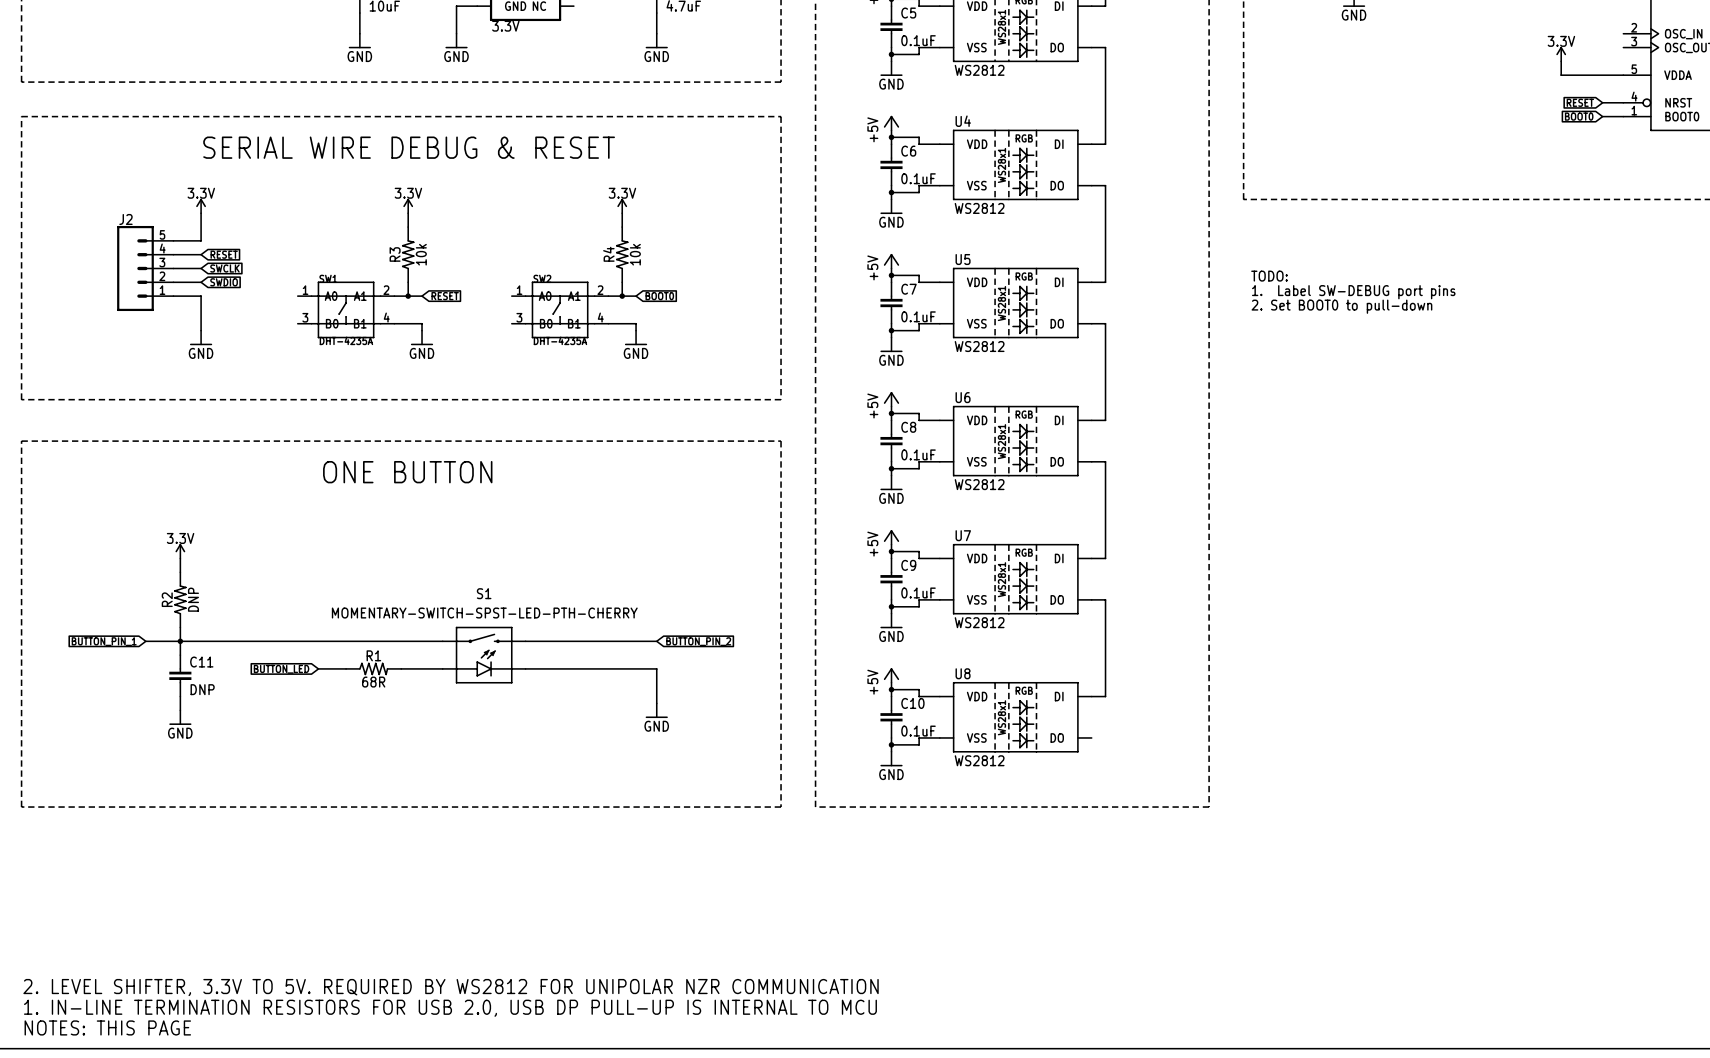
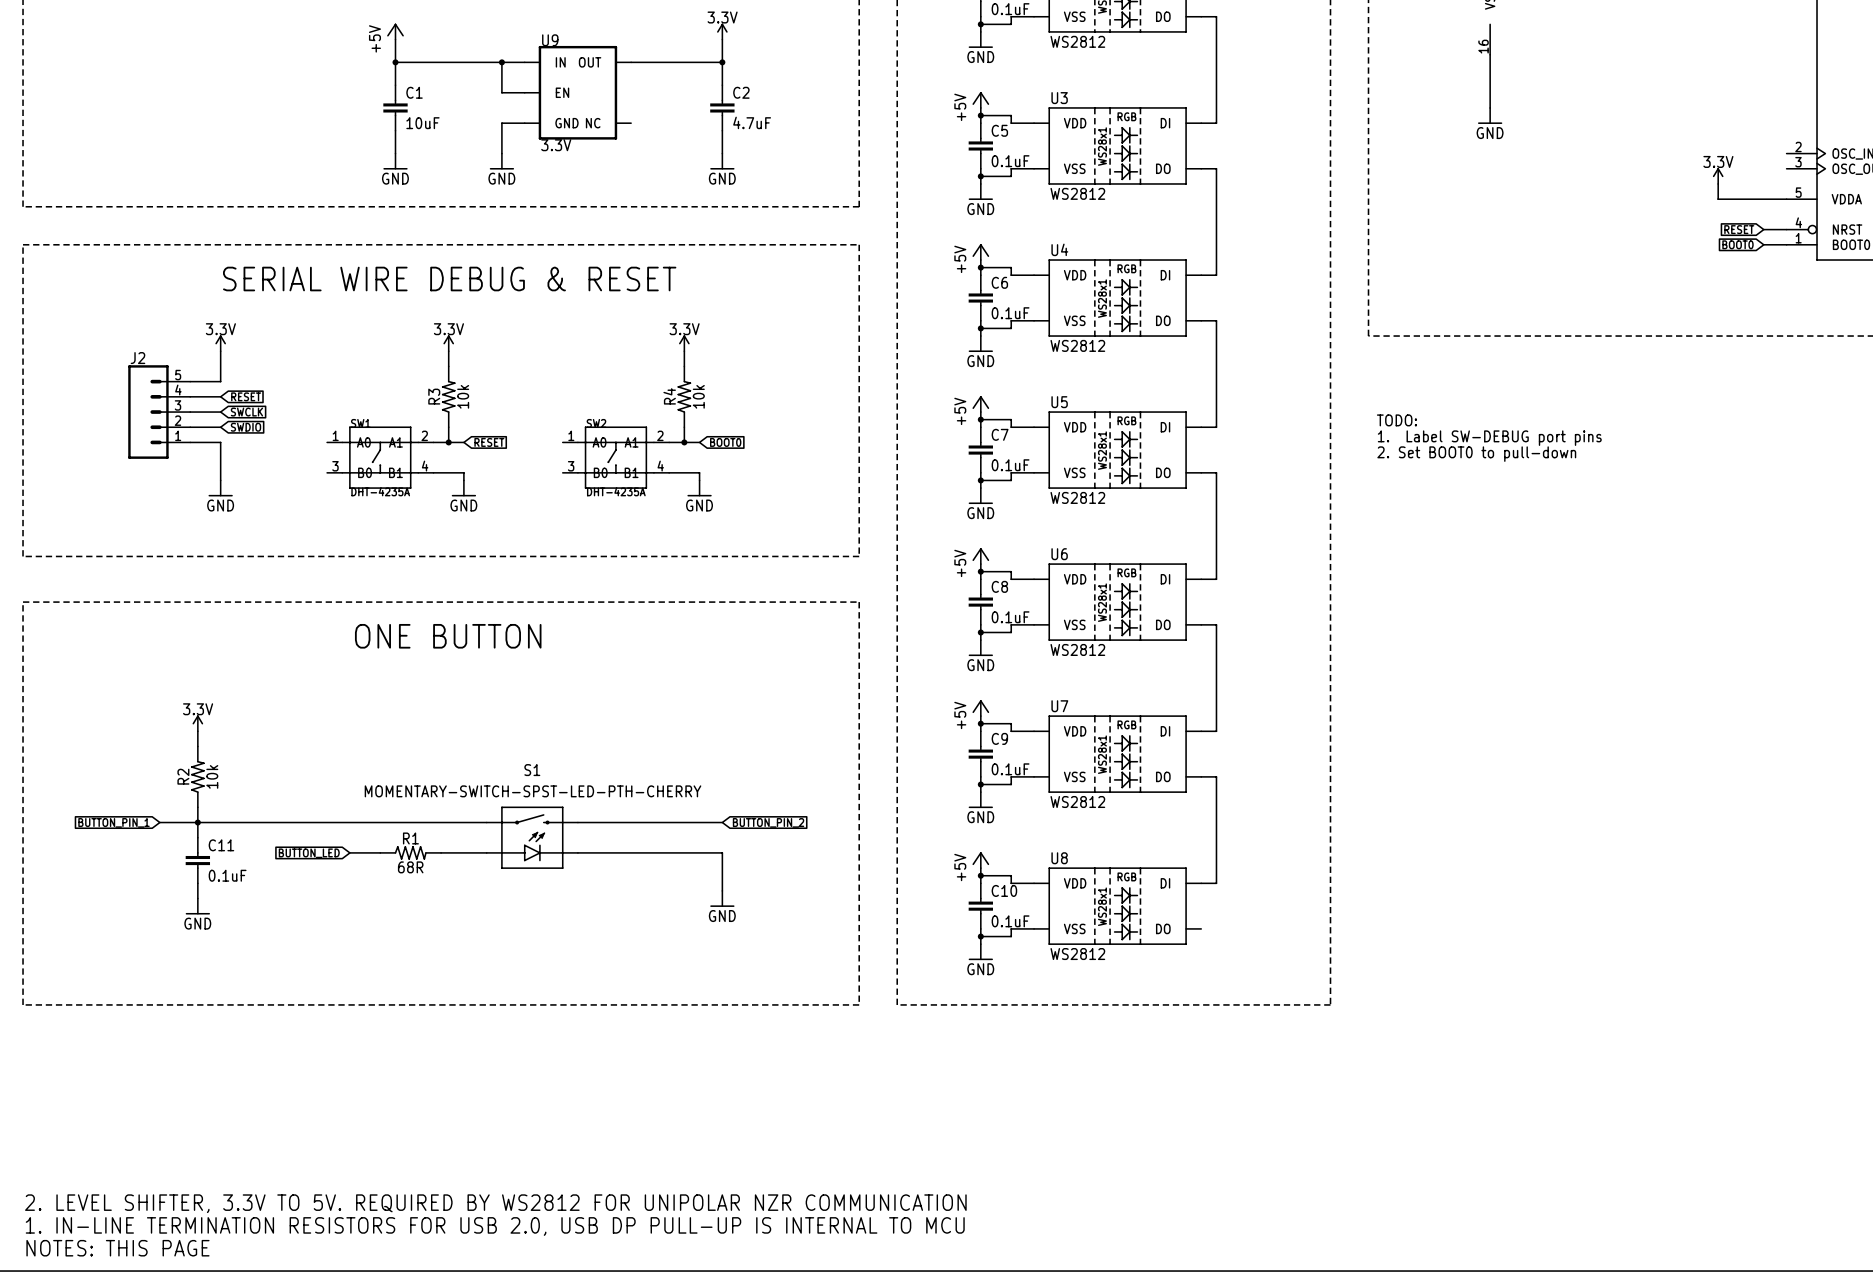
R2 value: DNP (193, 599) -> 10k (212, 776)
C11 value: DNP (202, 689) -> 0.1uF (227, 875)

